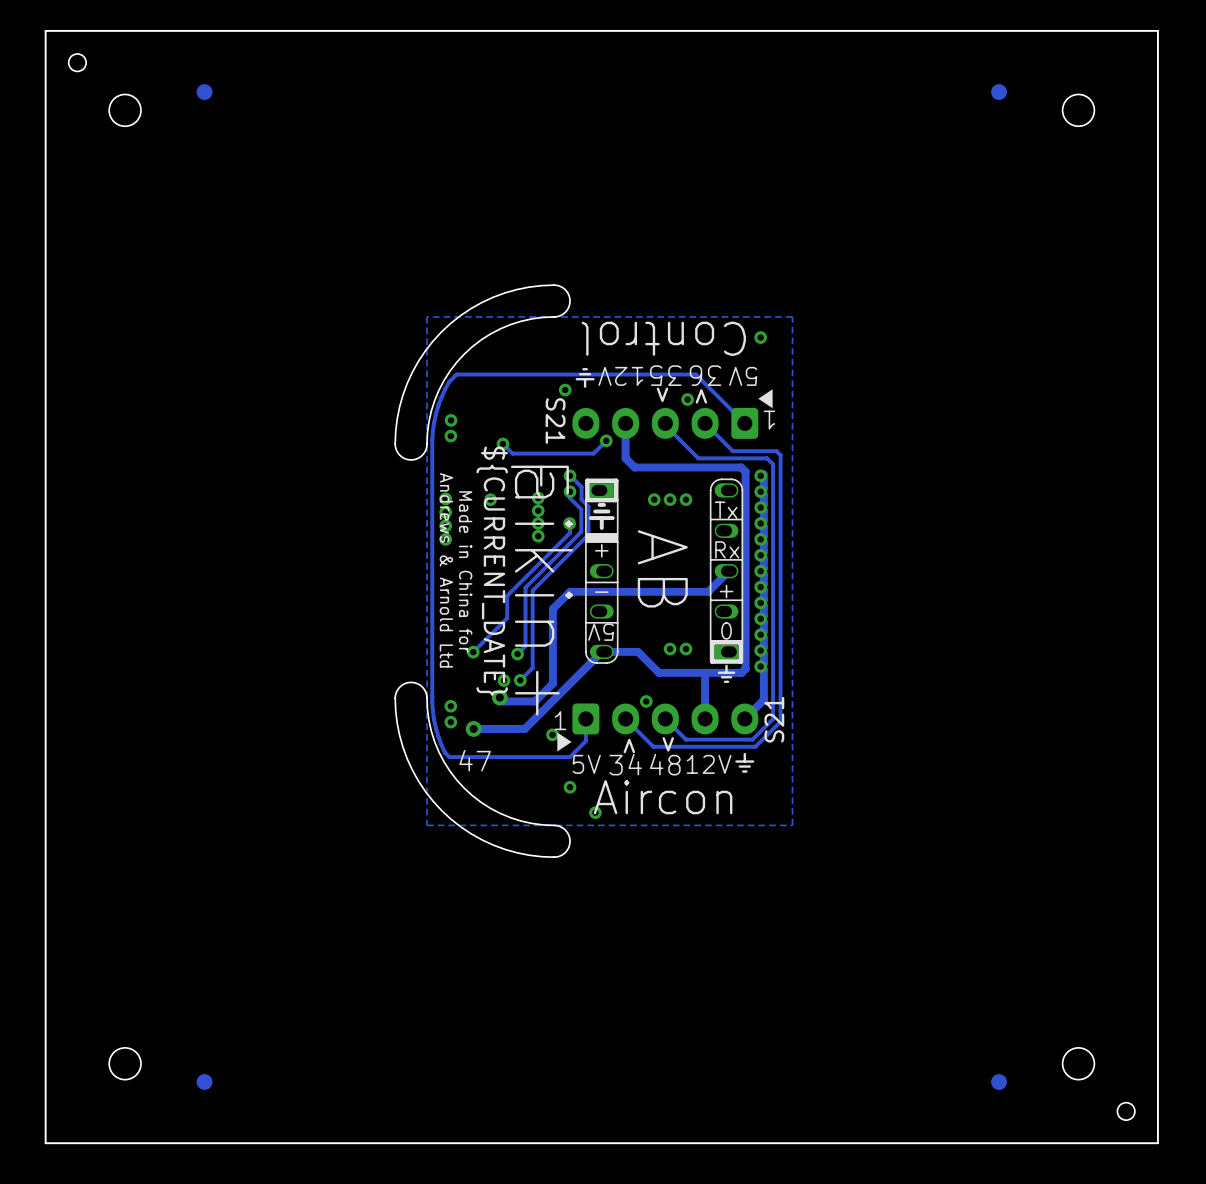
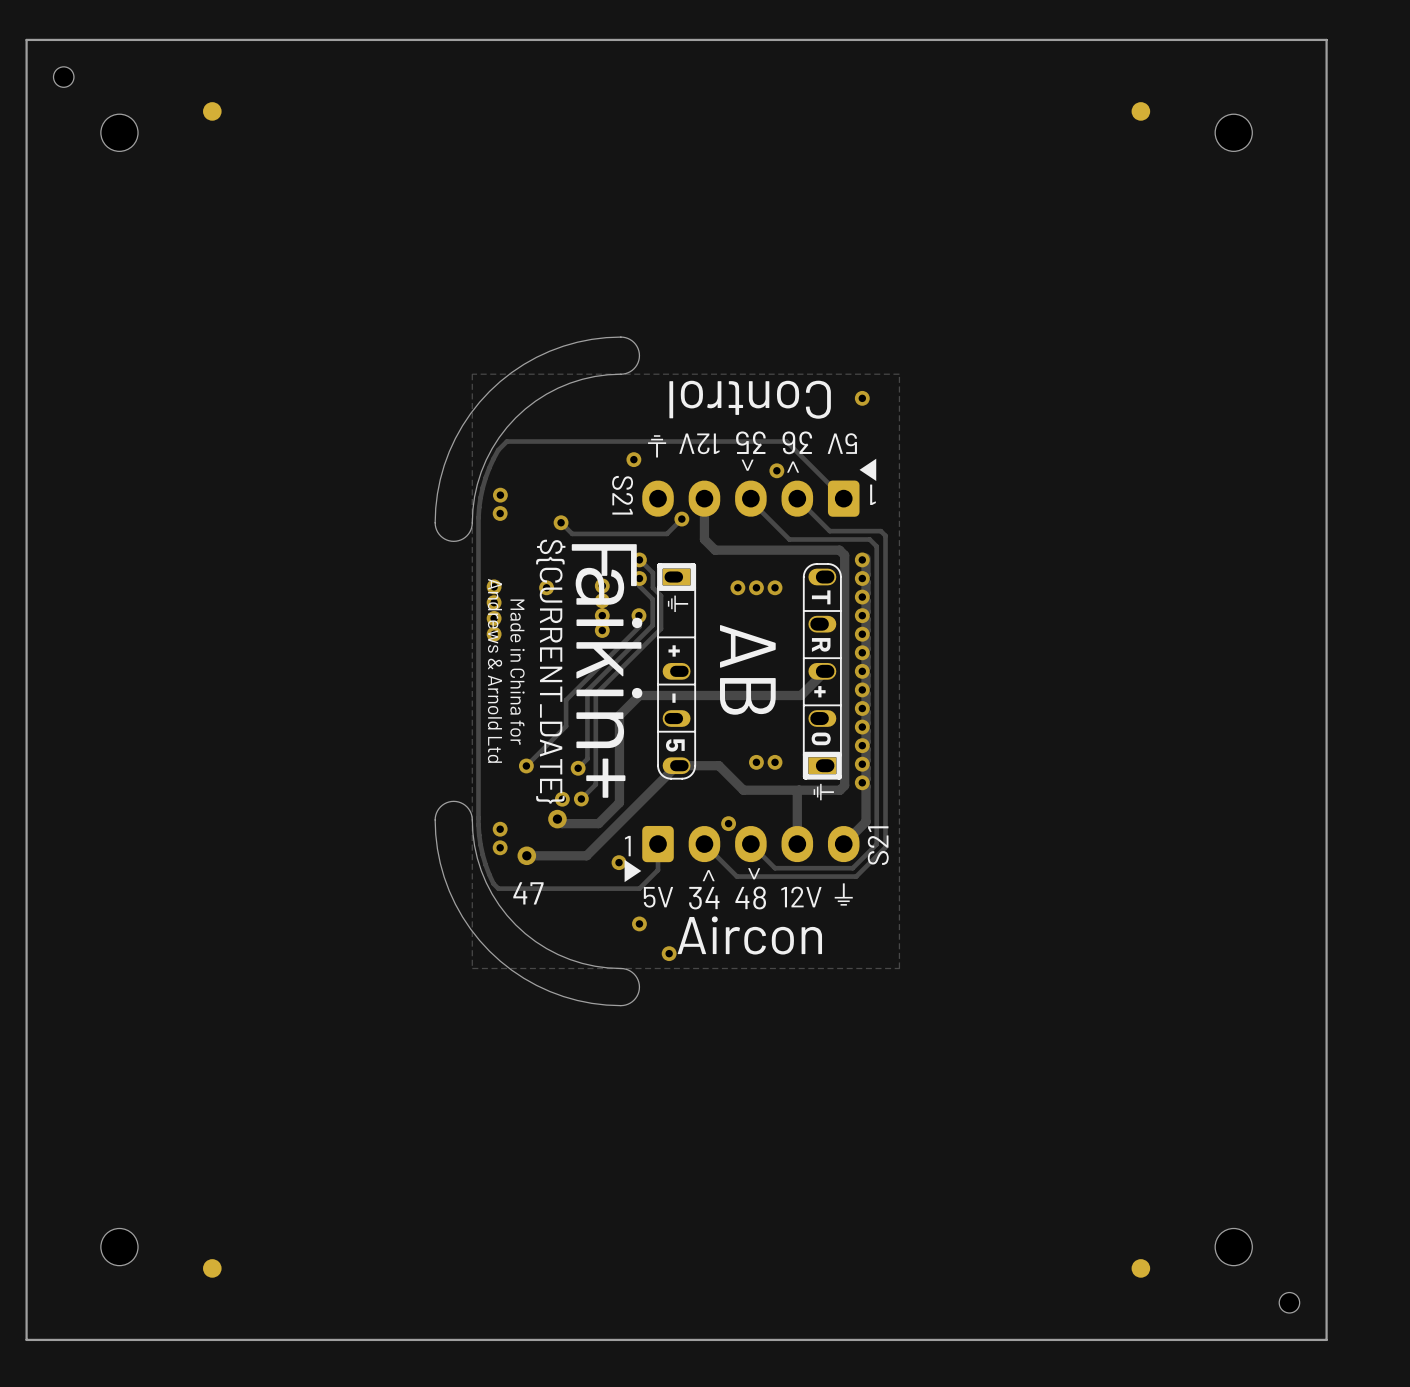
part footprint: [585, 478, 619, 664] -> [657, 563, 697, 780]
part footprint: [709, 478, 744, 664] -> [802, 563, 842, 780]

